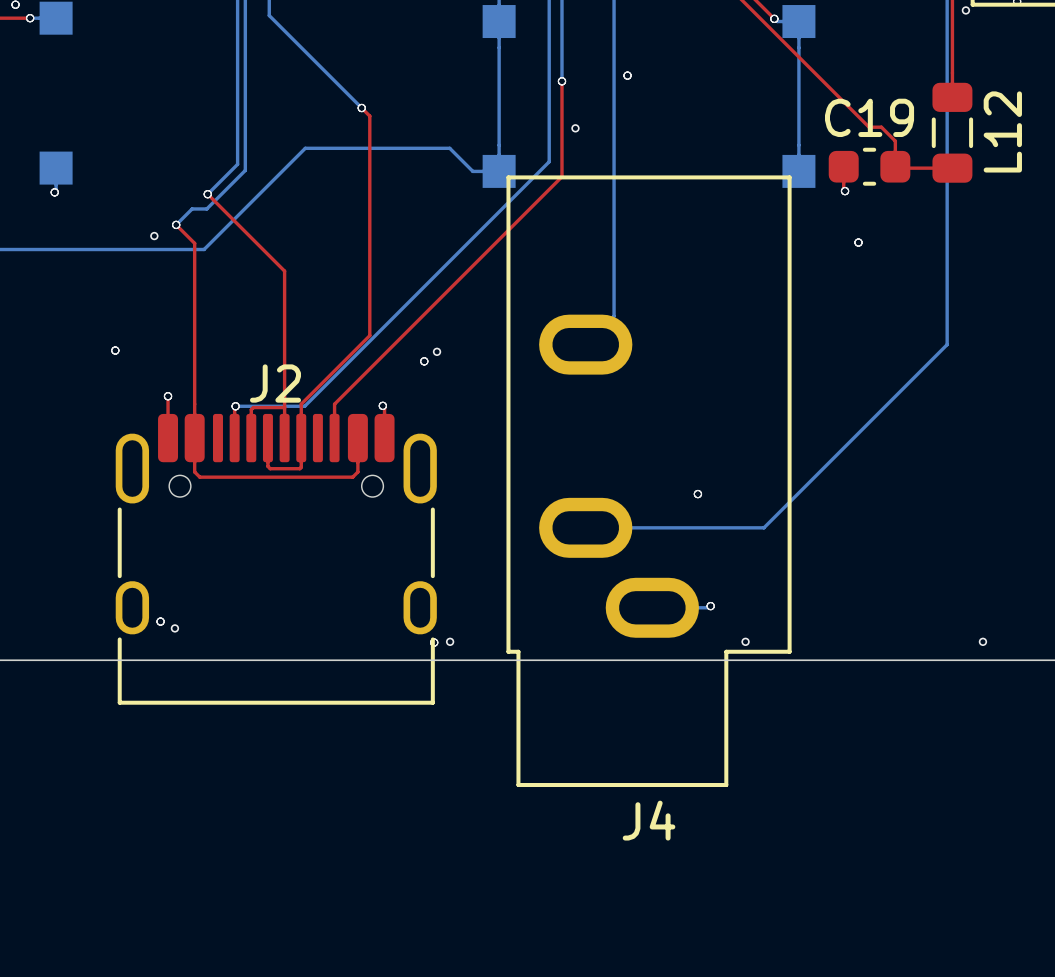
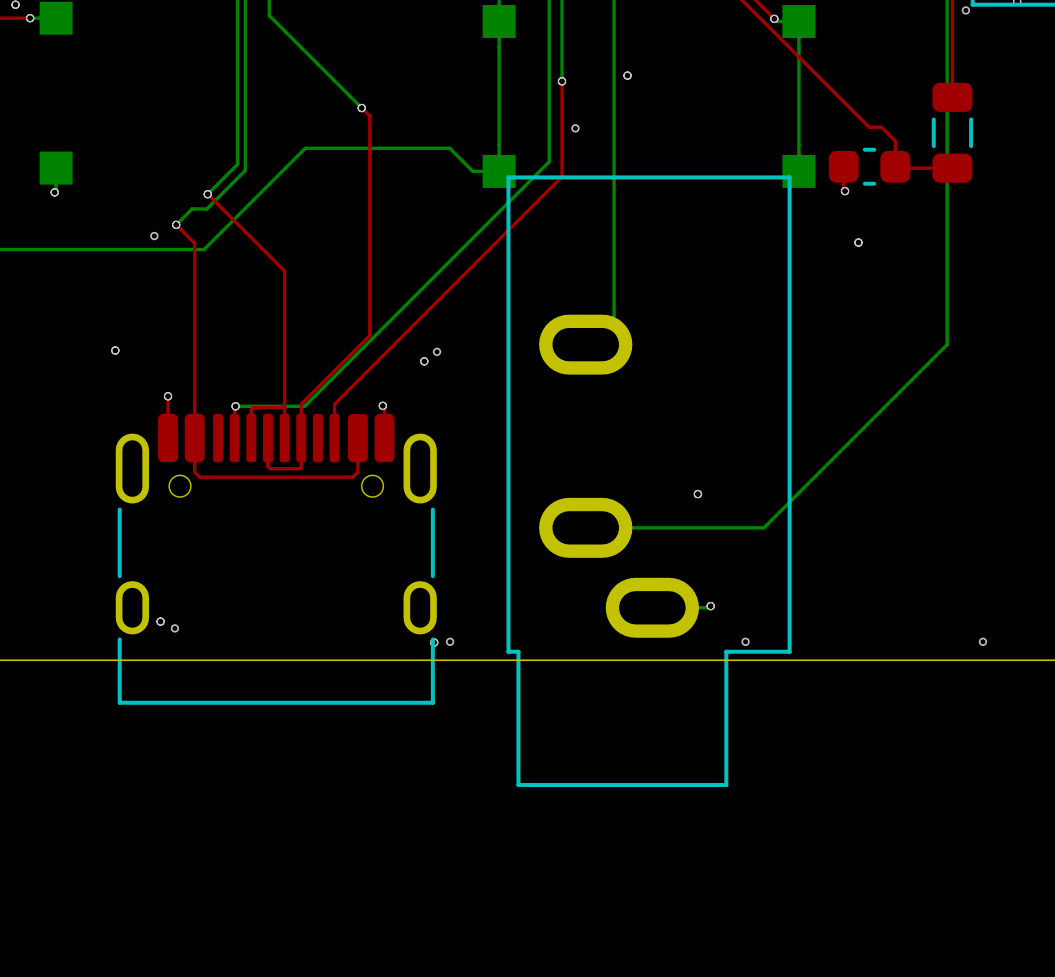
C19 name: C19 (869, 117) -> none
L12 name: L12 (1002, 131) -> none
J2 name: J2 (275, 383) -> none
J4 name: J4 (649, 820) -> none

